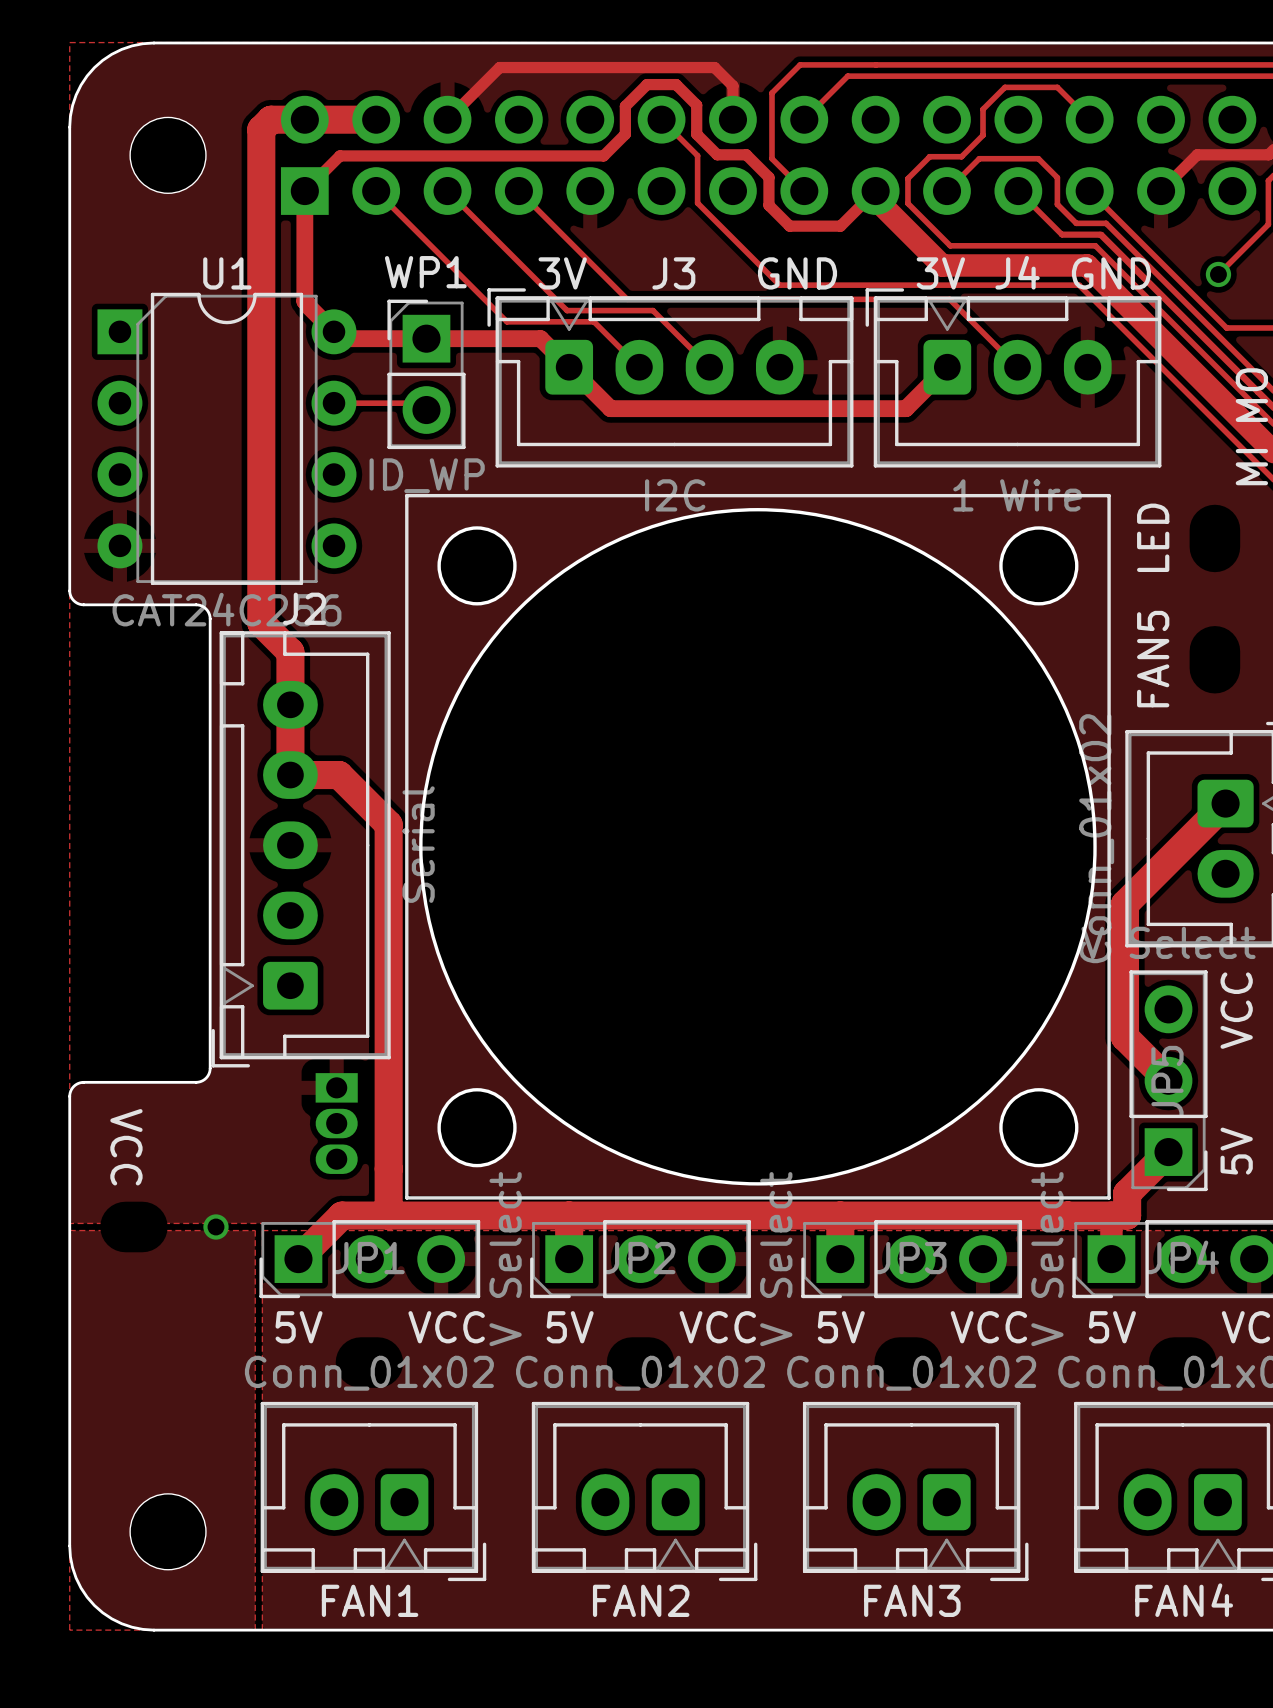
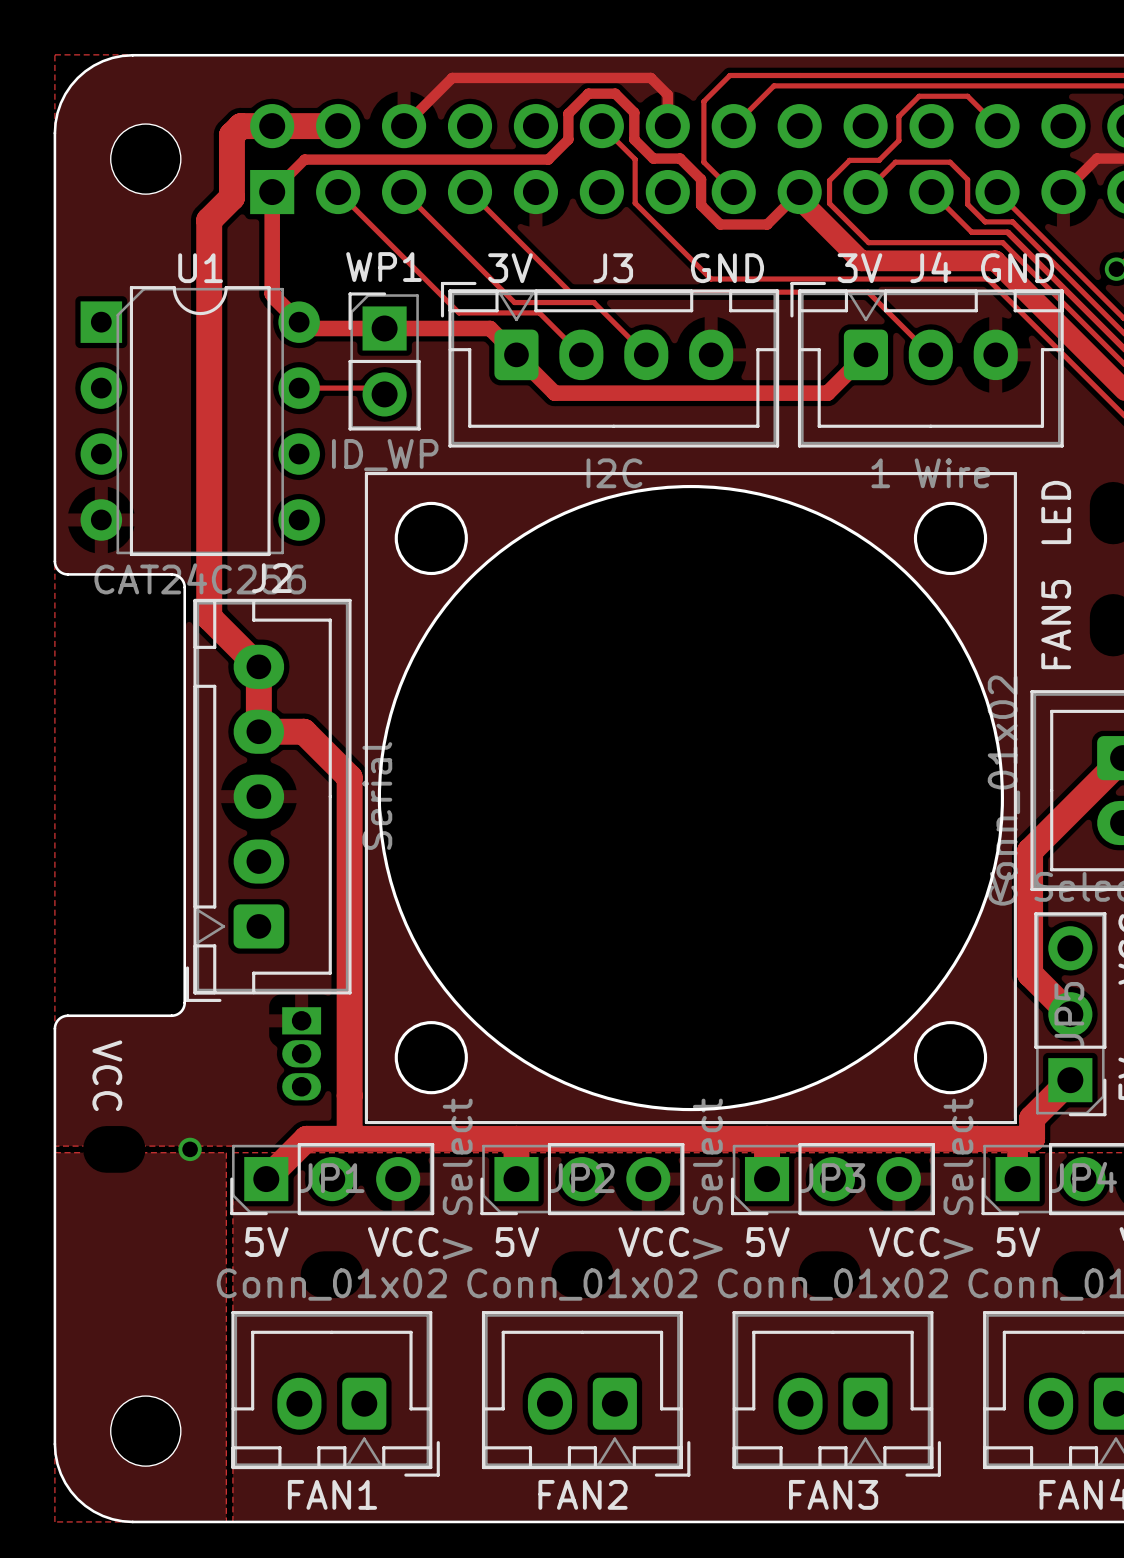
track: (261, 197) (261, 623) (290, 652) (290, 704) -> (231, 197) (209, 220) (209, 617) (258, 666)

